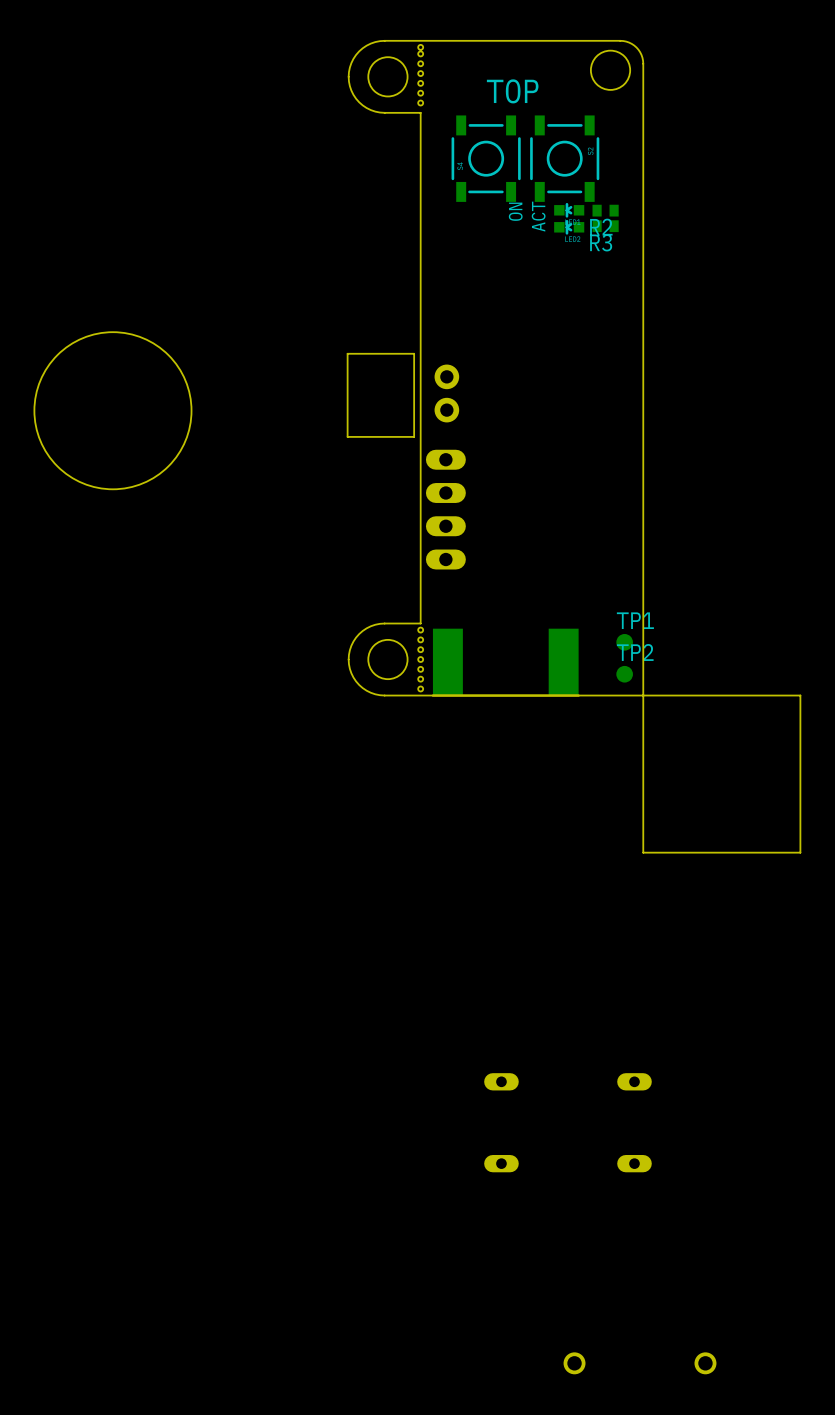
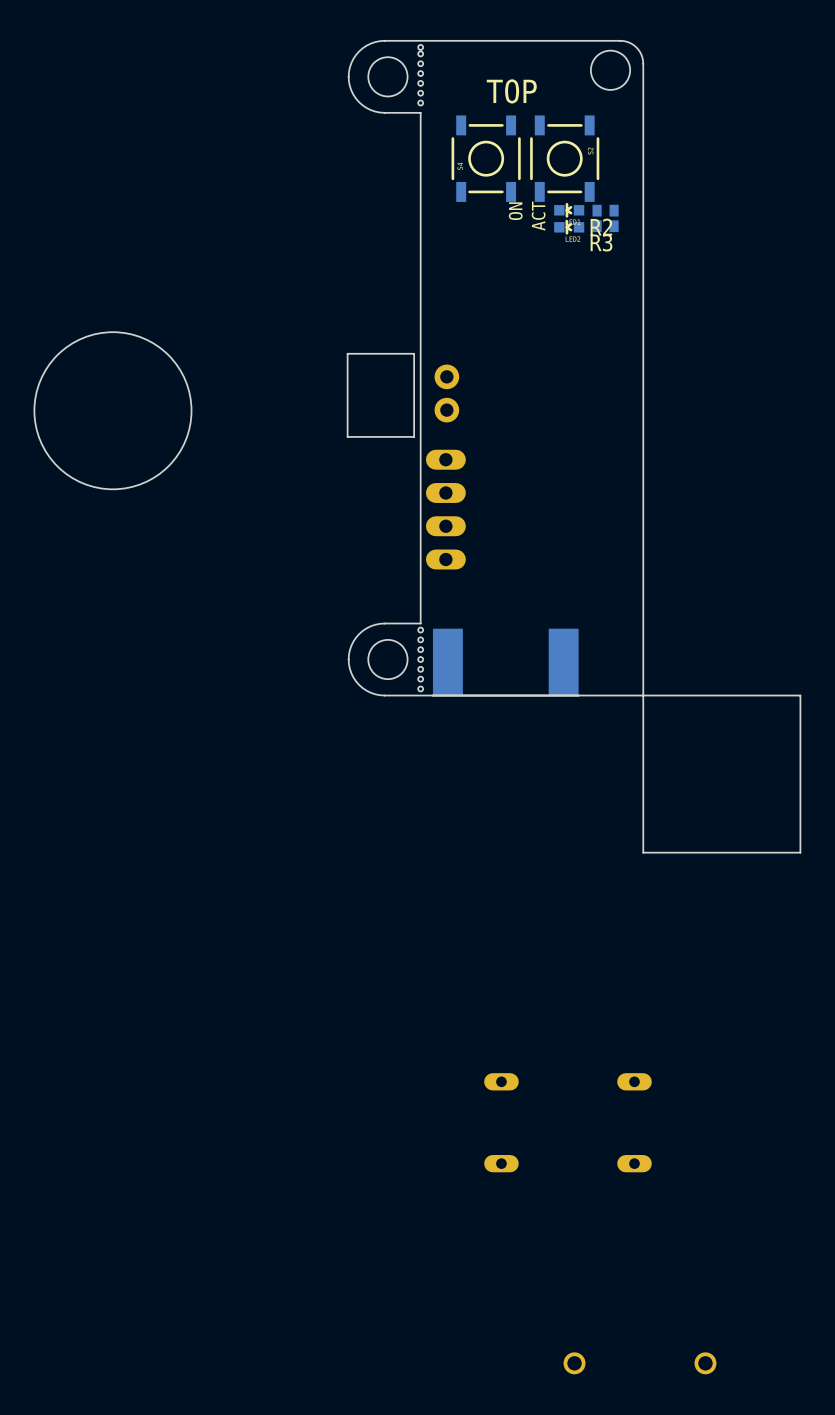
TP1: (624, 642) -> none
TP2: (624, 674) -> none

